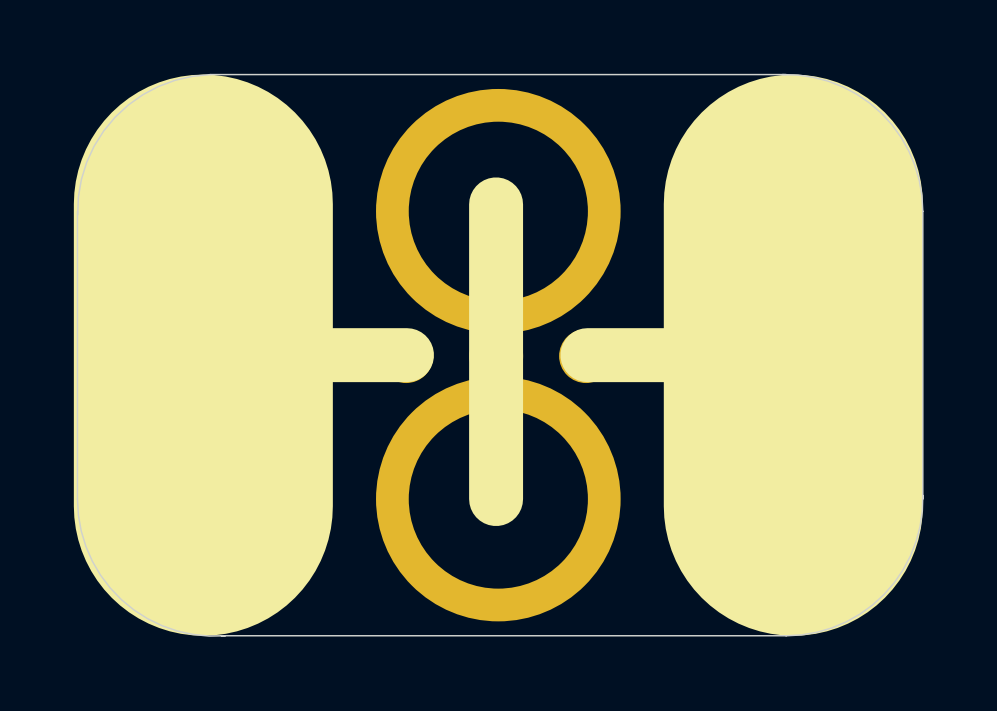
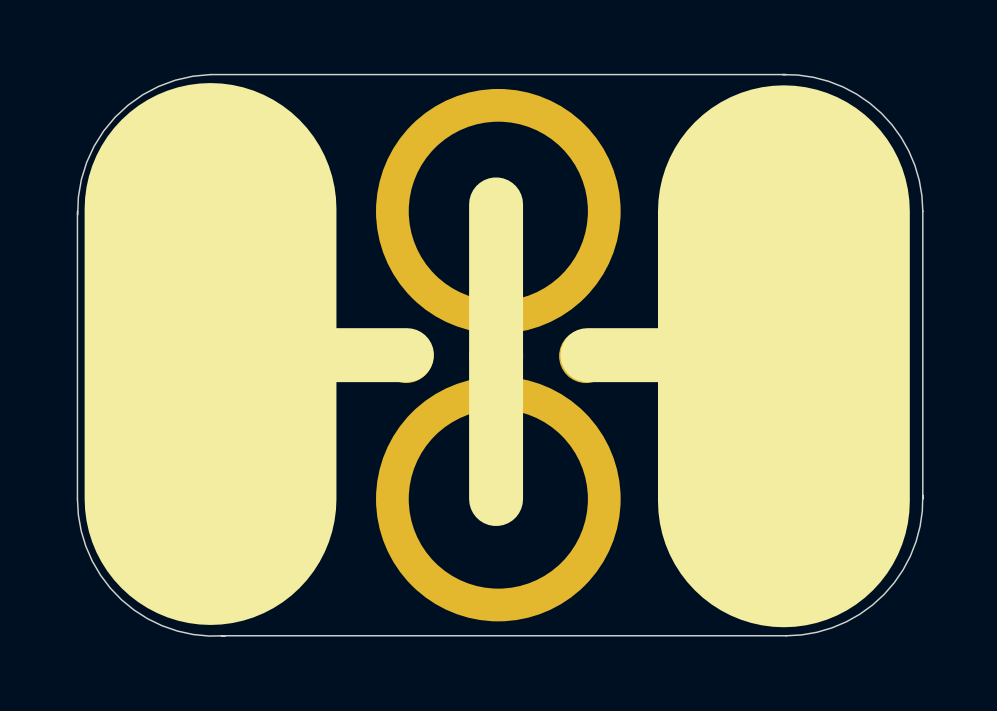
part footprint: [73, 73, 924, 637] -> [76, 73, 924, 637]

